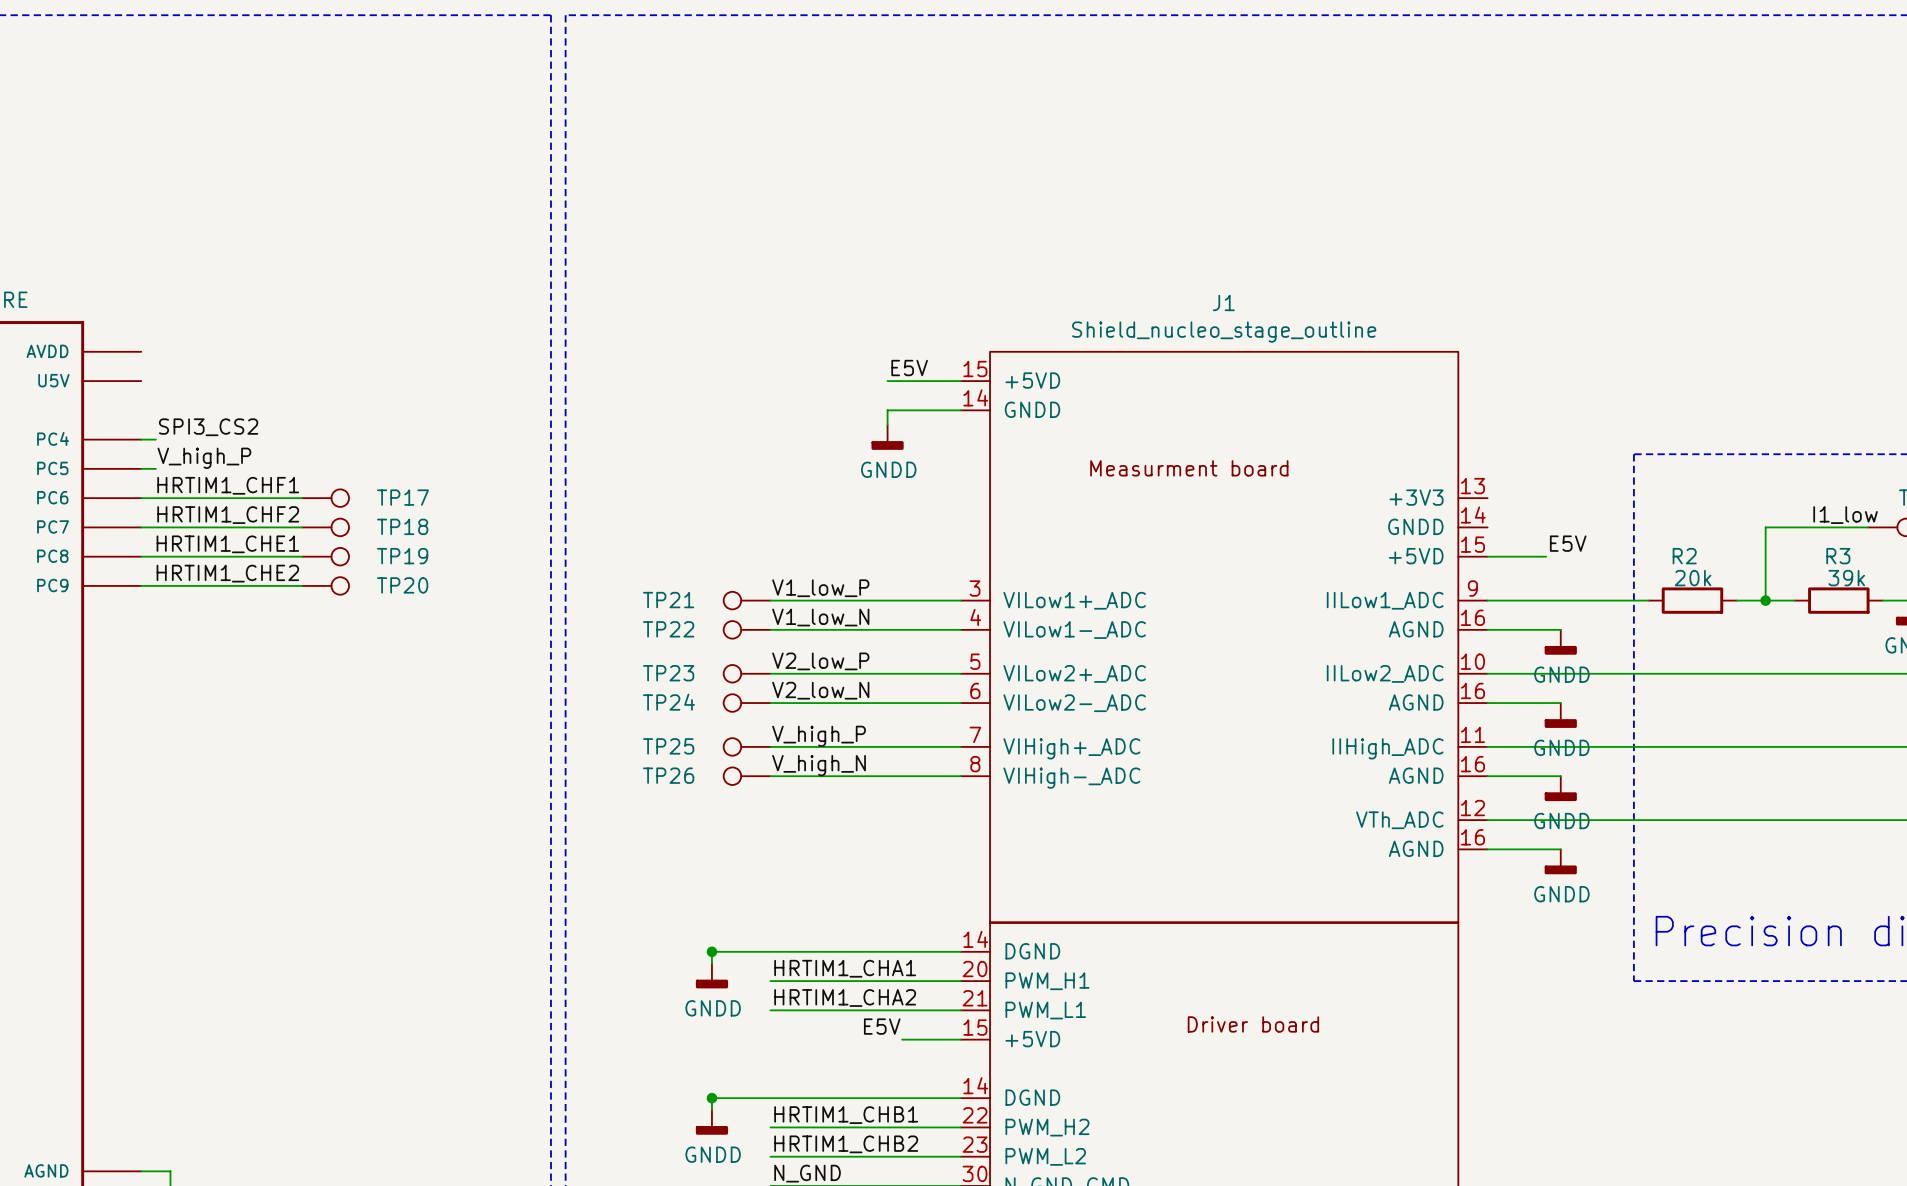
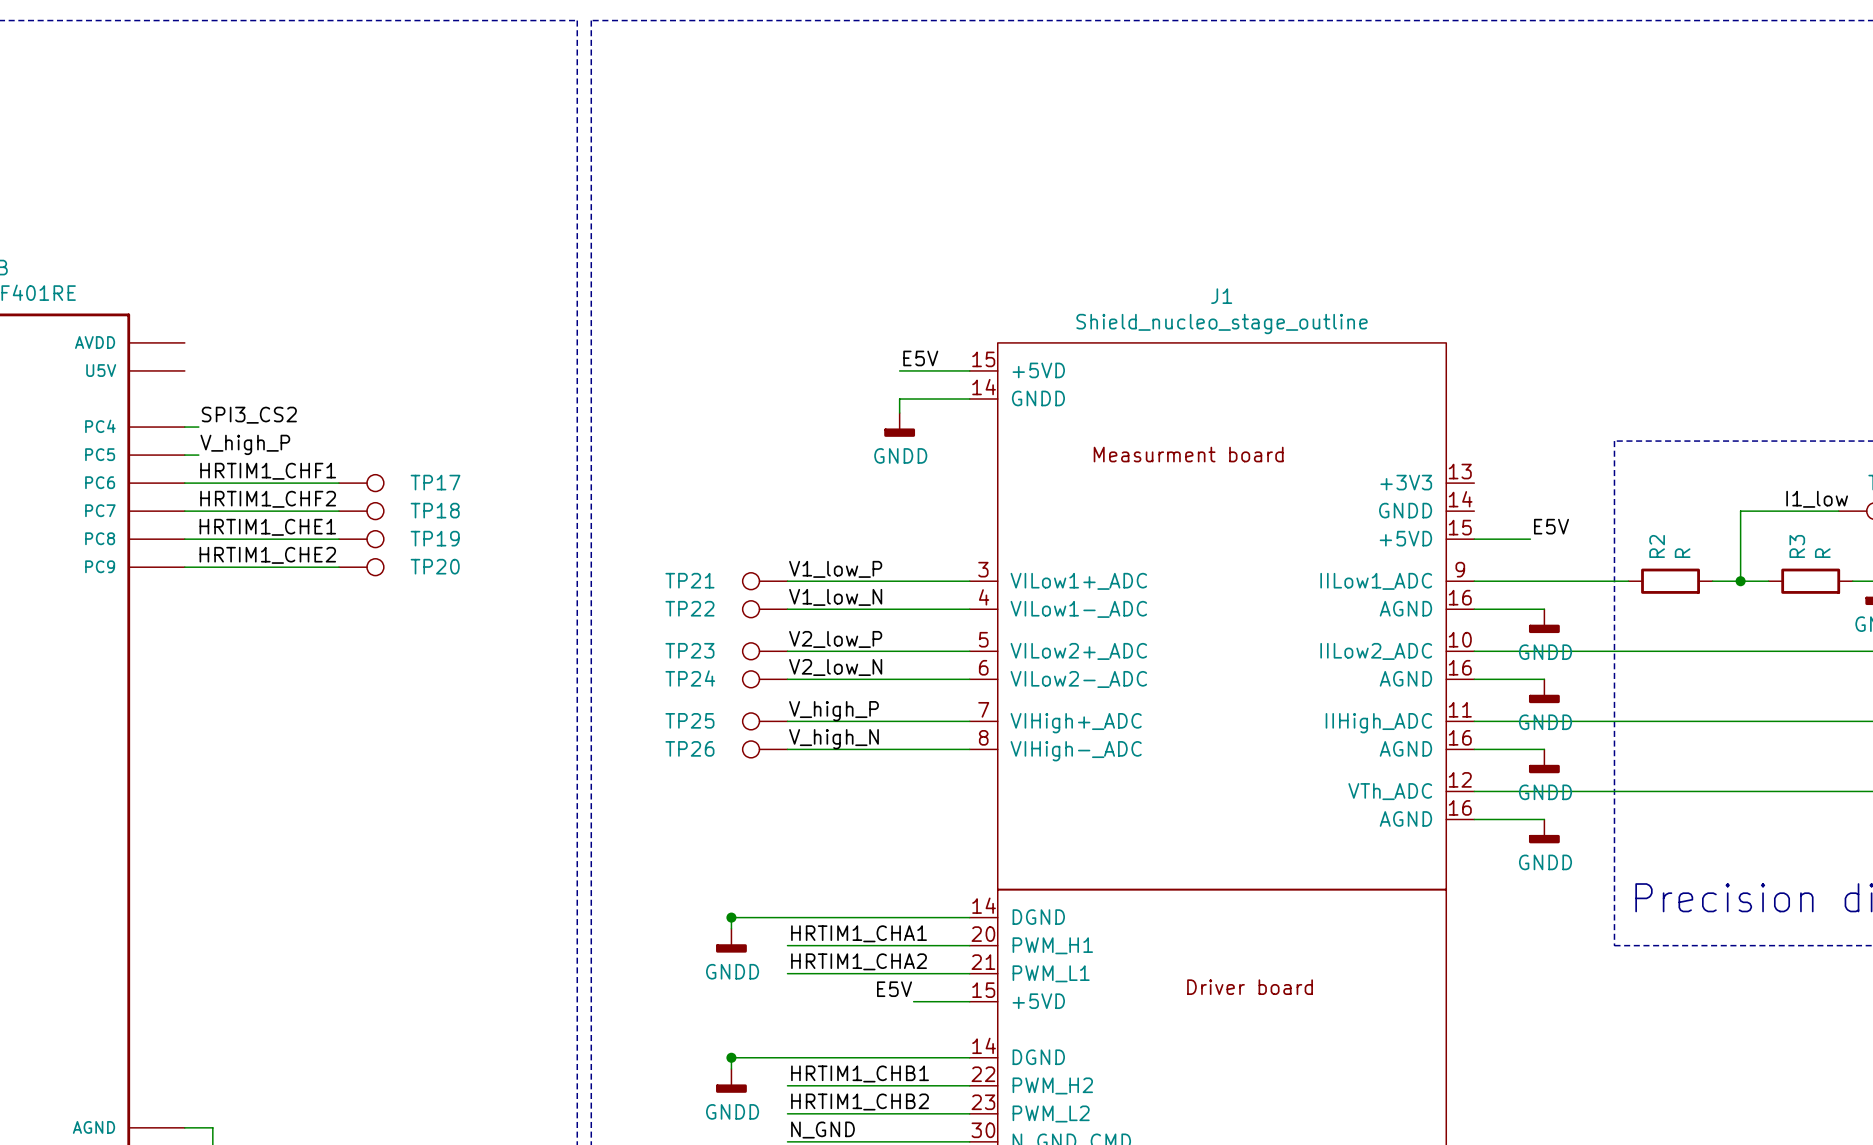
R2 name rotation: 0° (1684, 556) -> 90° counterclockwise (1657, 546)
R3 name rotation: 0° (1838, 556) -> 90° counterclockwise (1797, 546)
R2 value: 20k (1693, 578) -> R (1682, 553)
R3 value: 39k (1846, 578) -> R (1822, 553)

